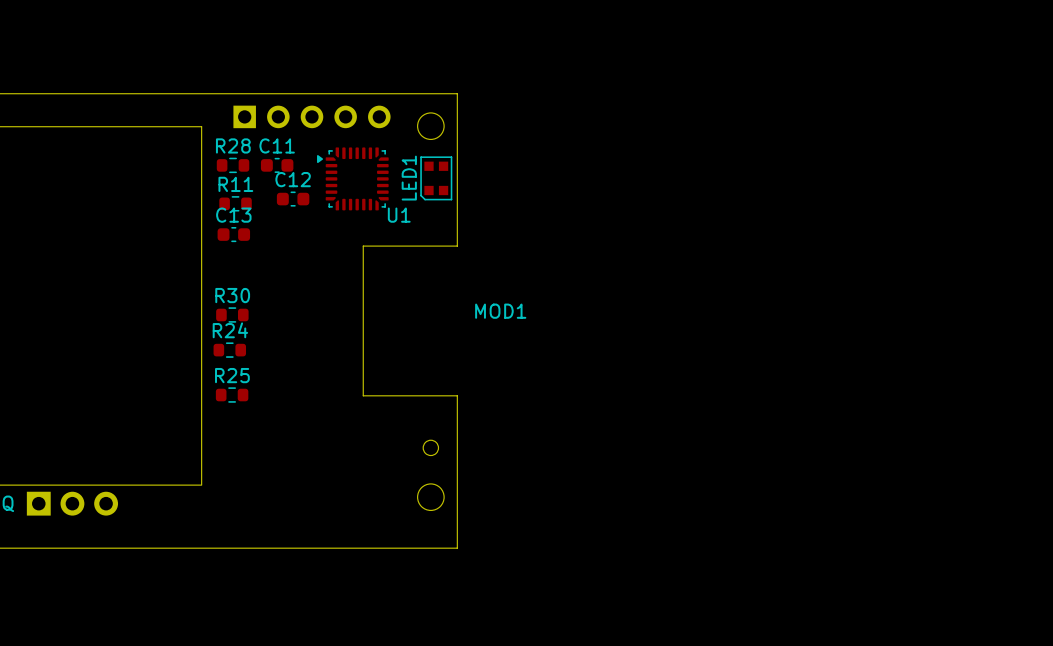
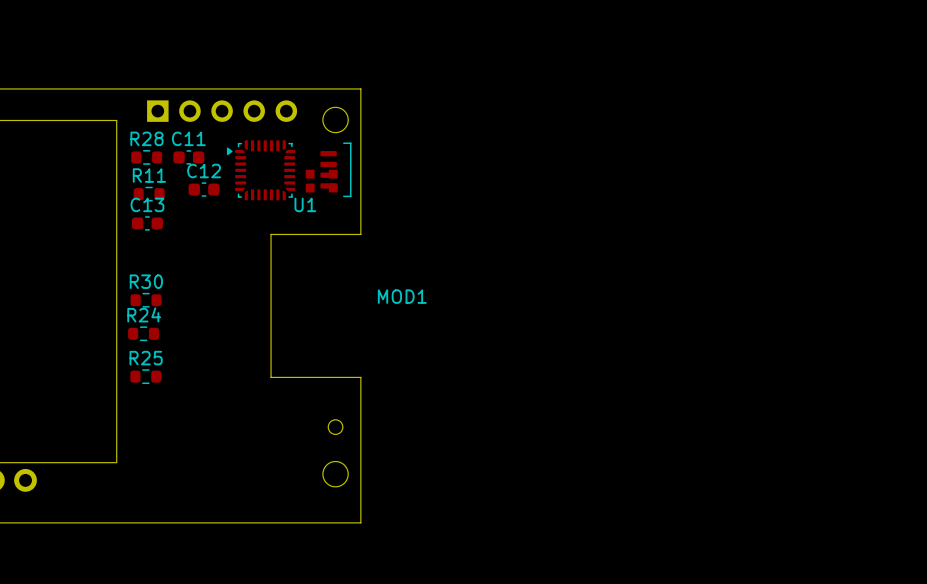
part: none -> (328, 169)
LED1: (436, 178) -> none

